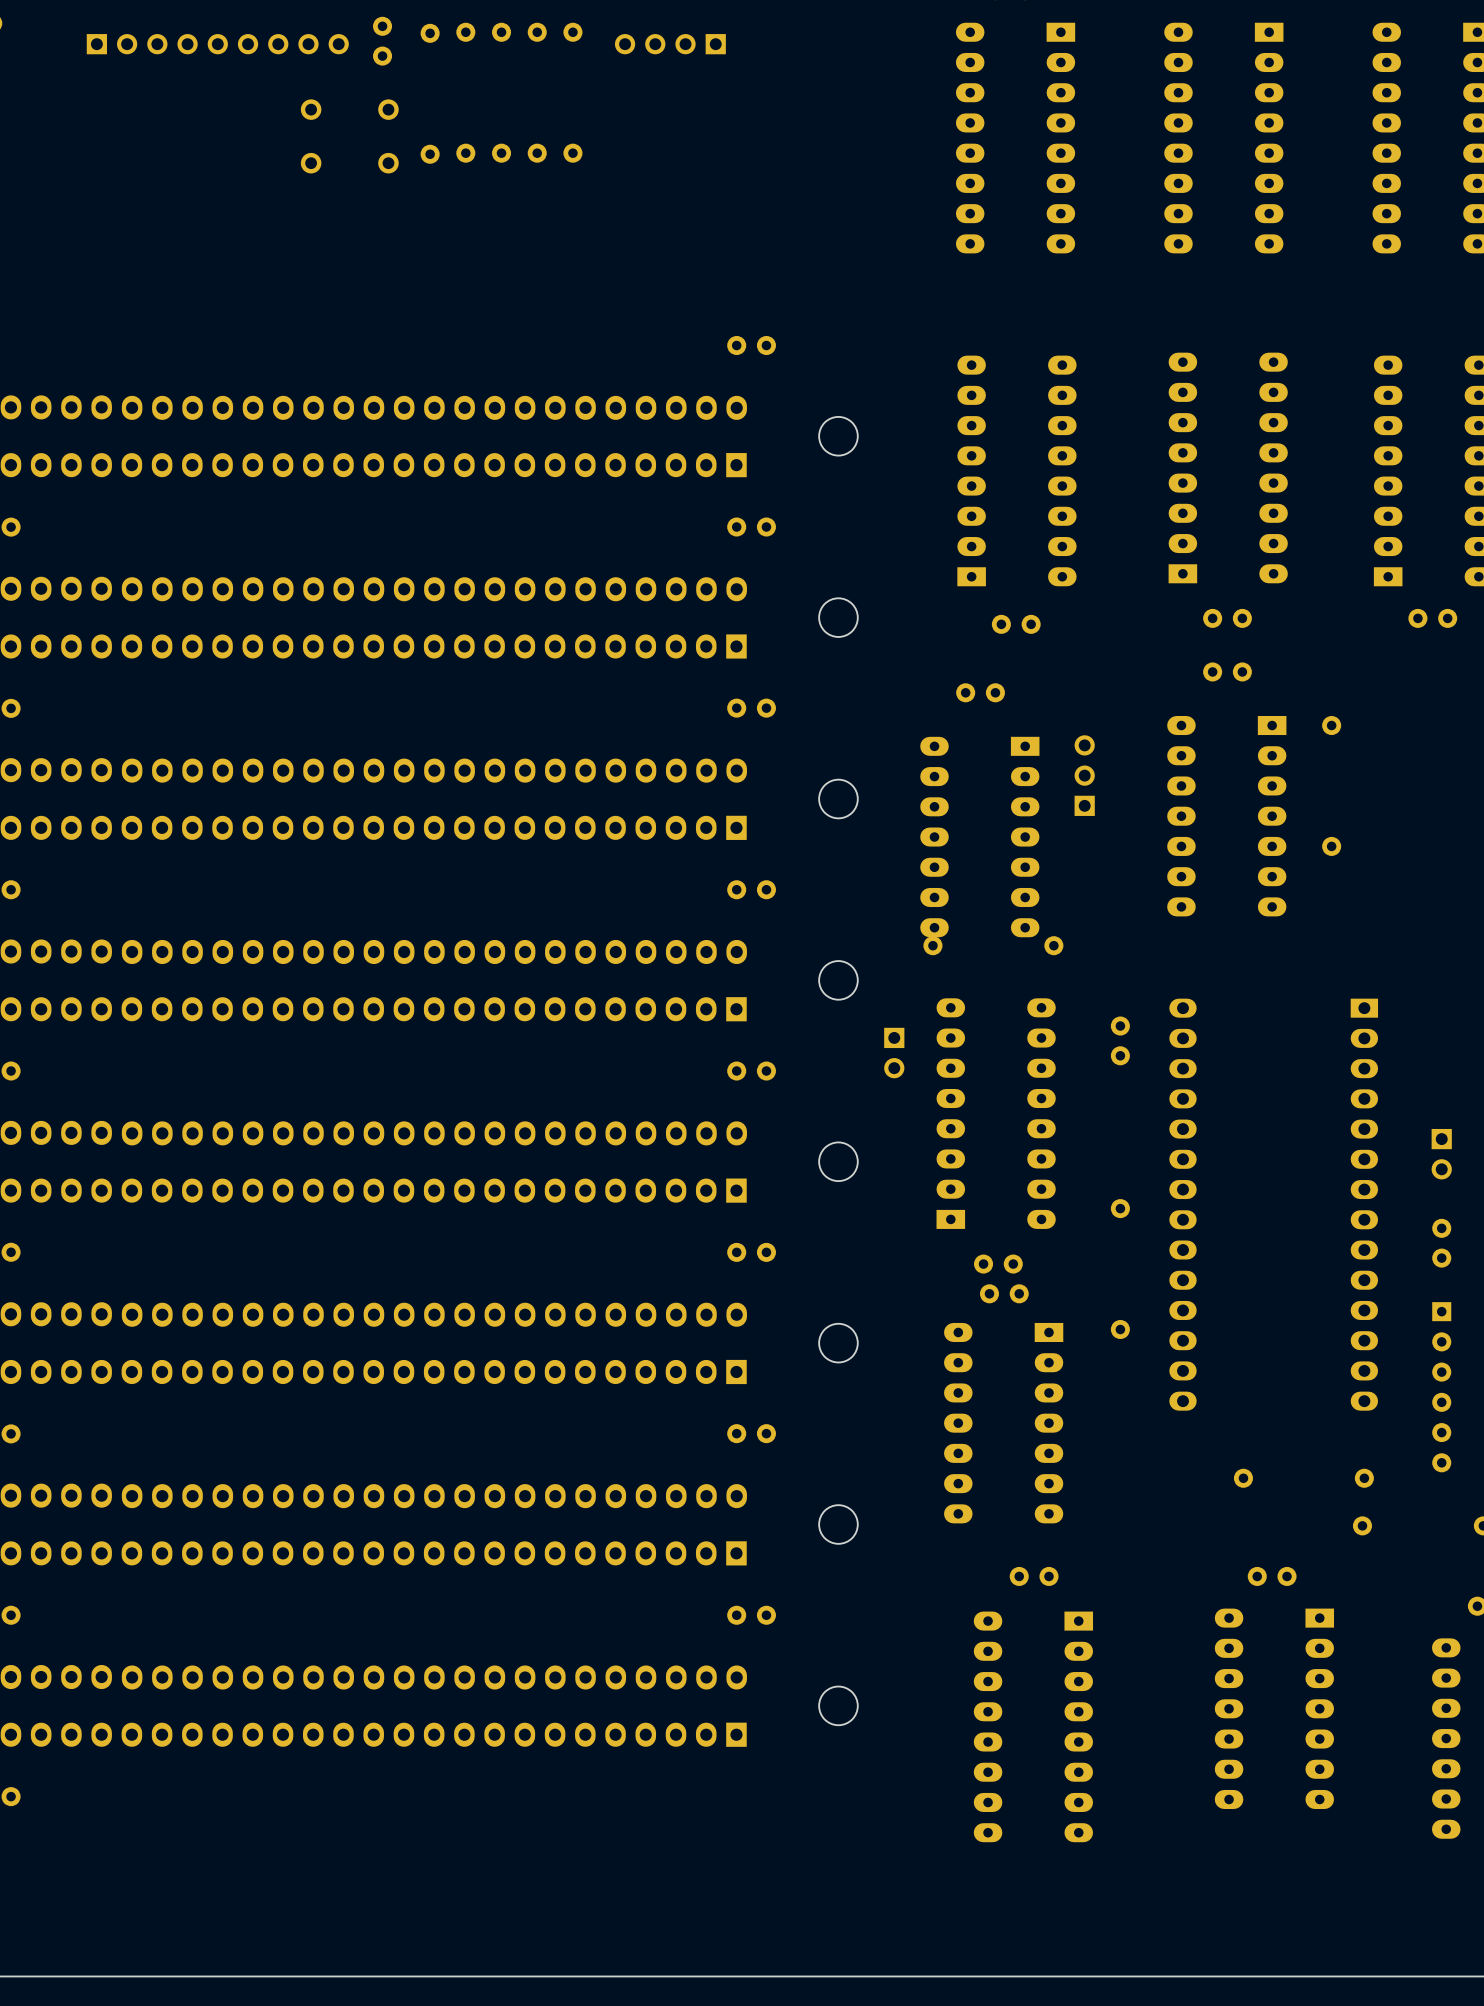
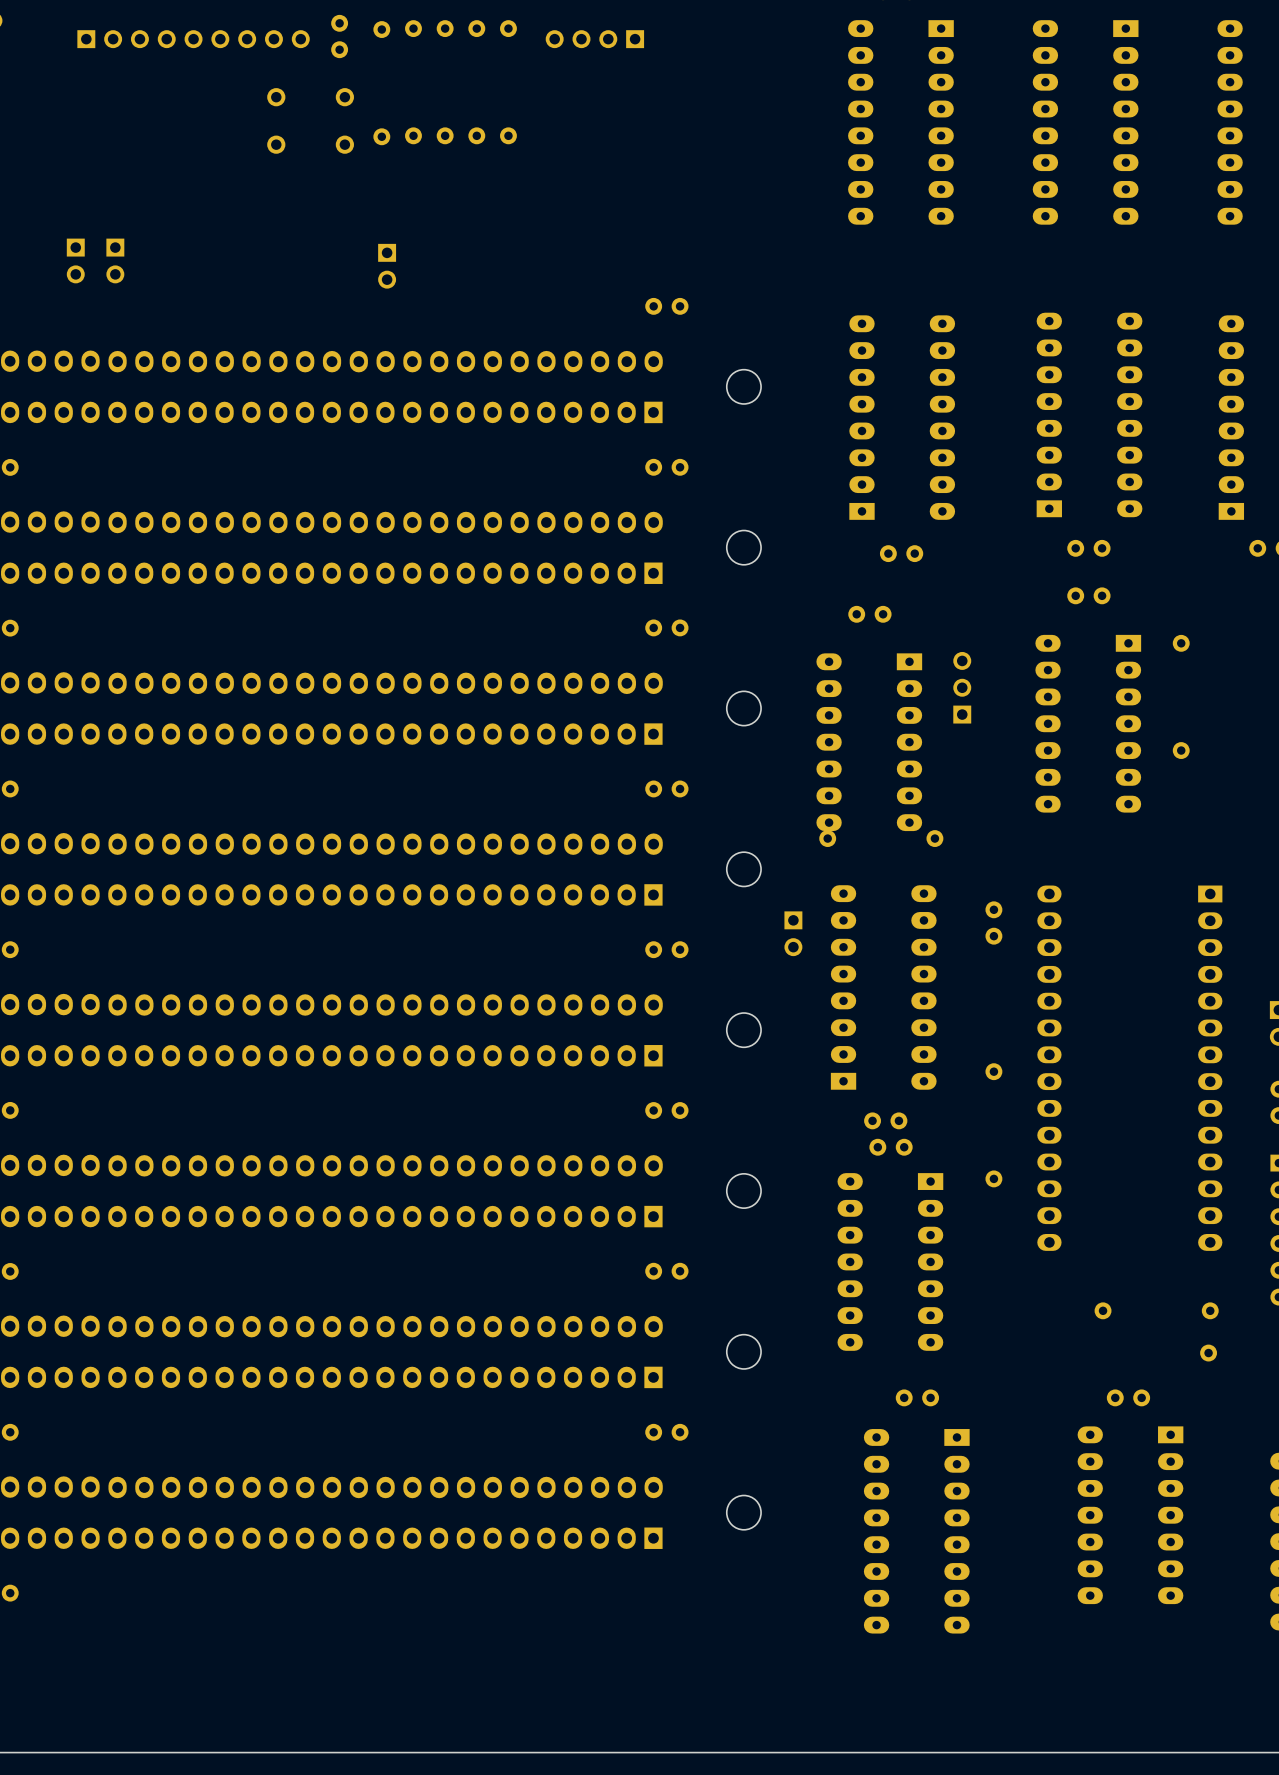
part: none -> (75, 260)
part: none -> (115, 260)
part: none -> (387, 266)

